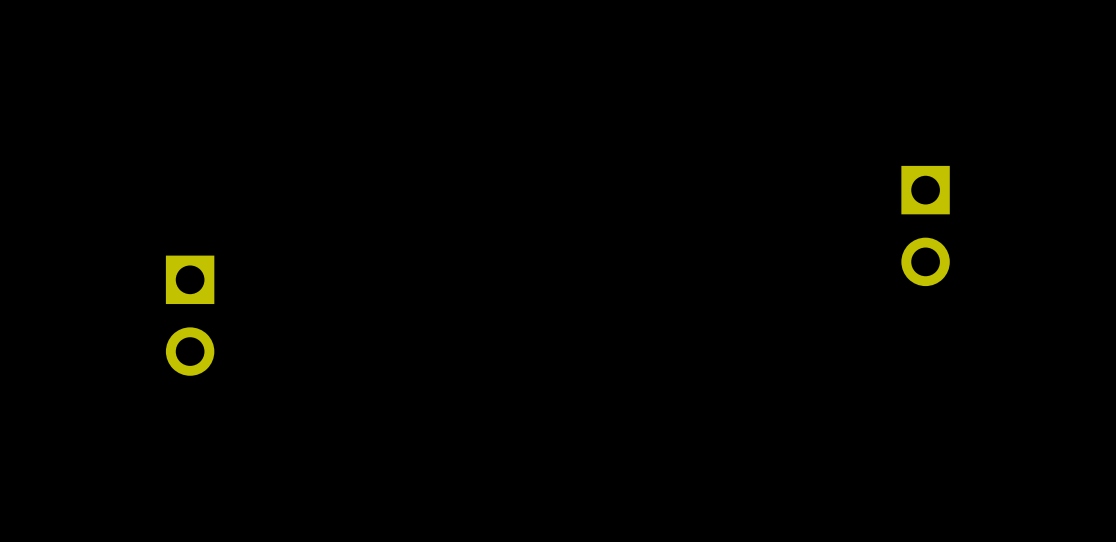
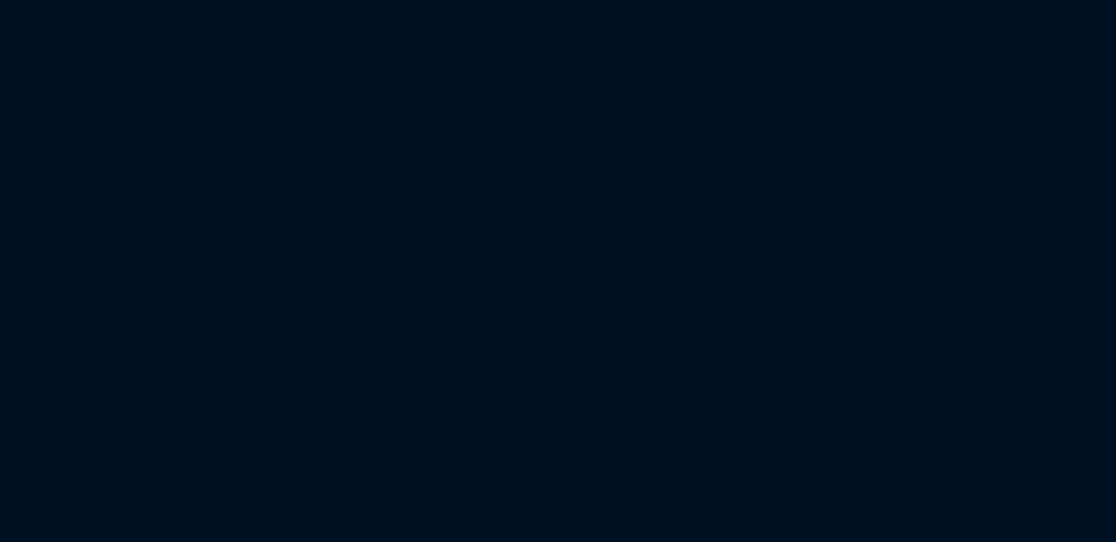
part: (925, 225) -> none
part: (190, 315) -> none

